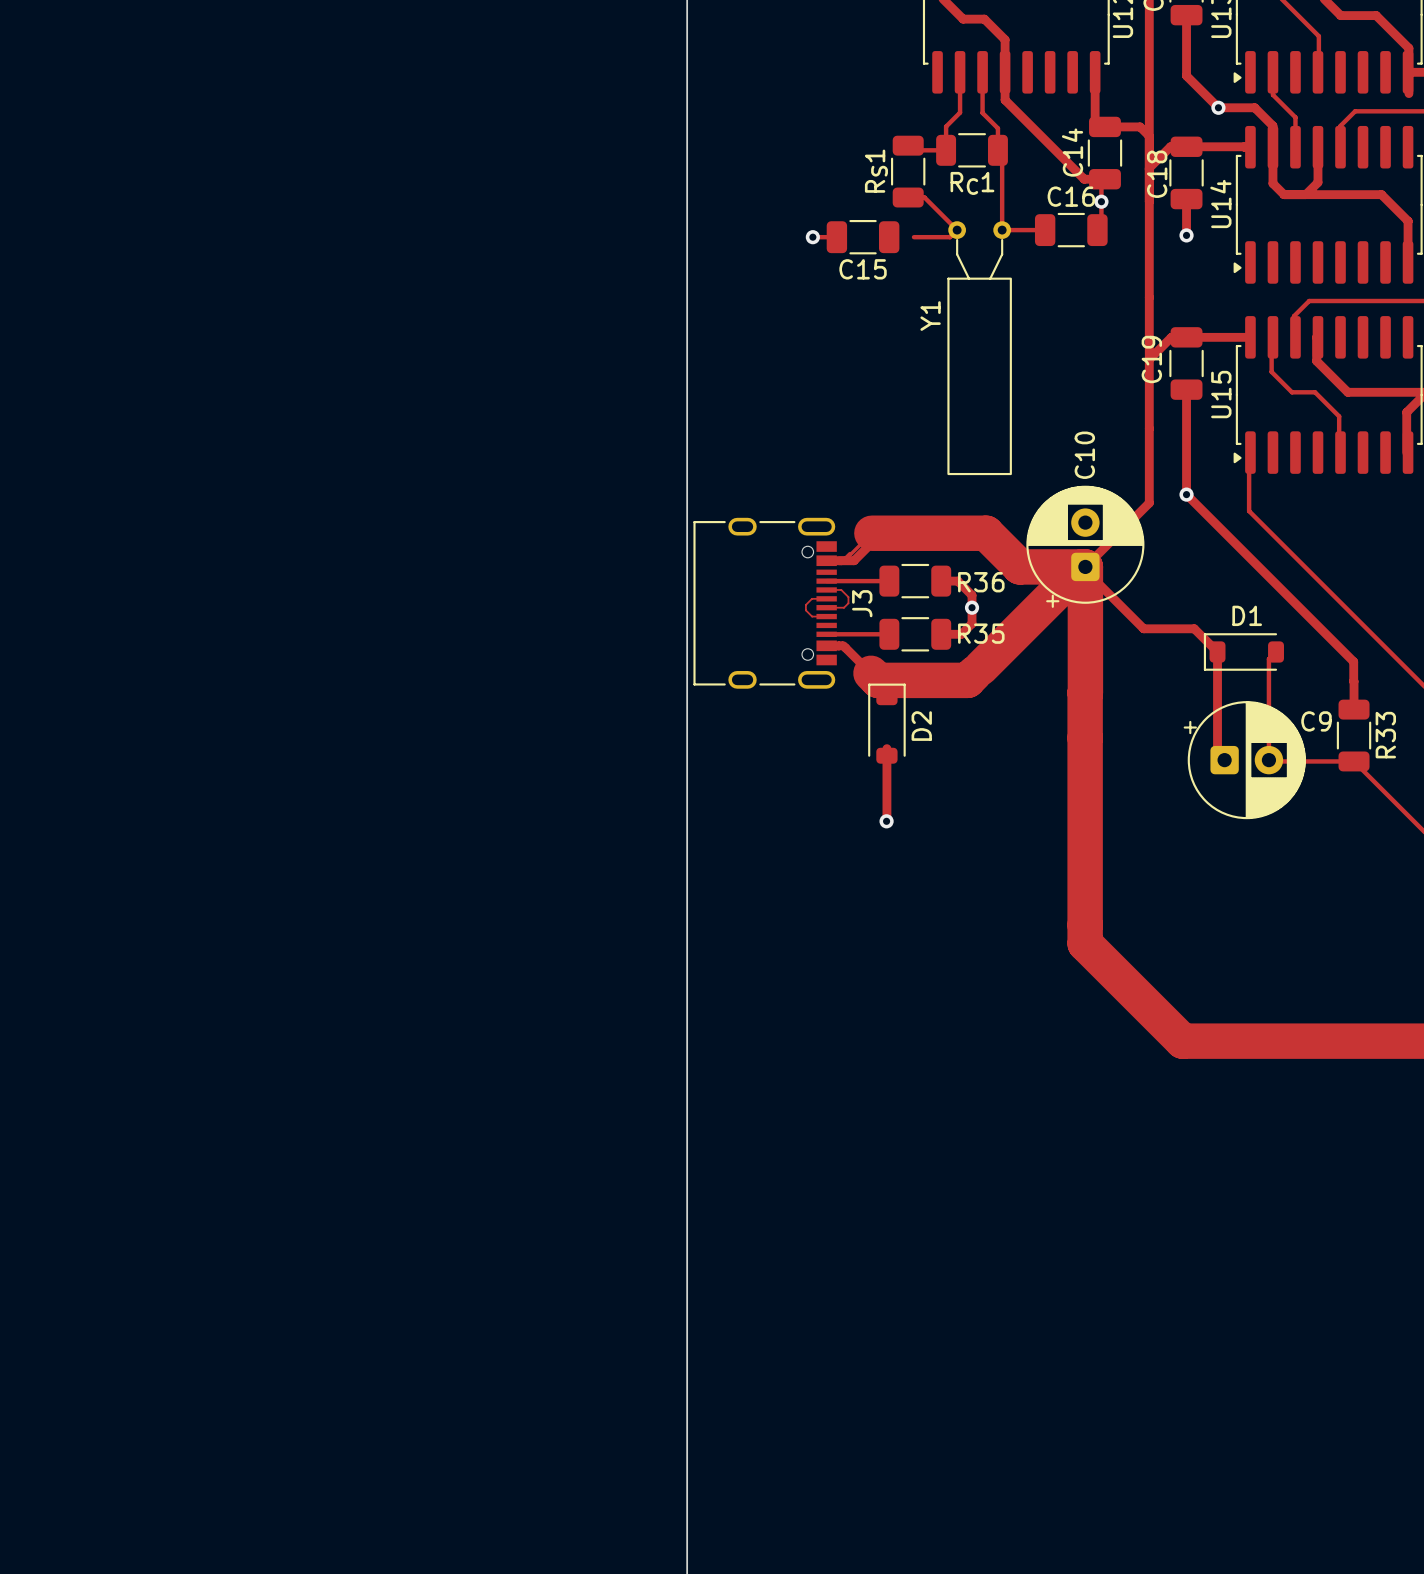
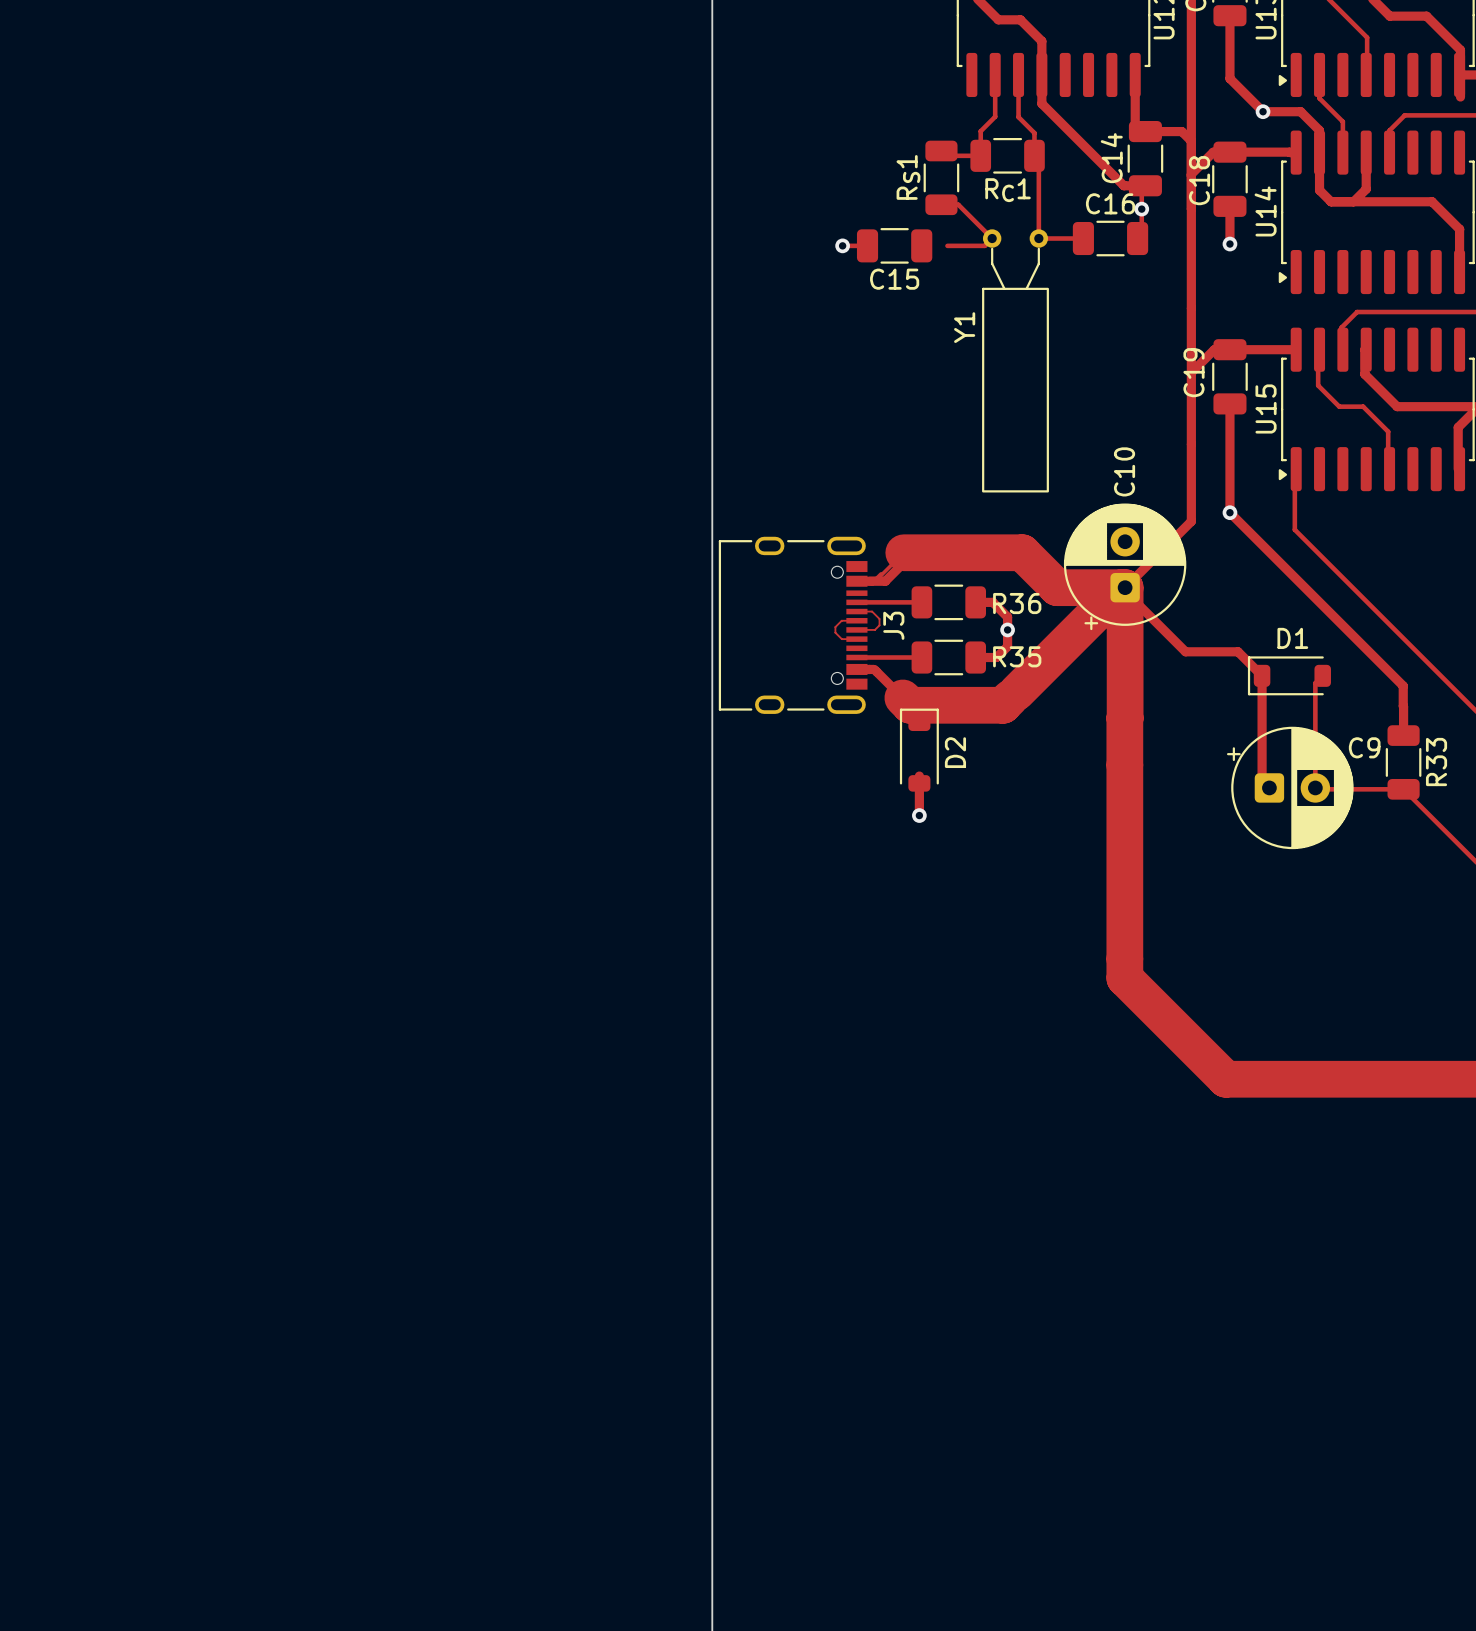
track: (886, 786) (886, 821) -> none
via position: (886, 821) -> (919, 815)

